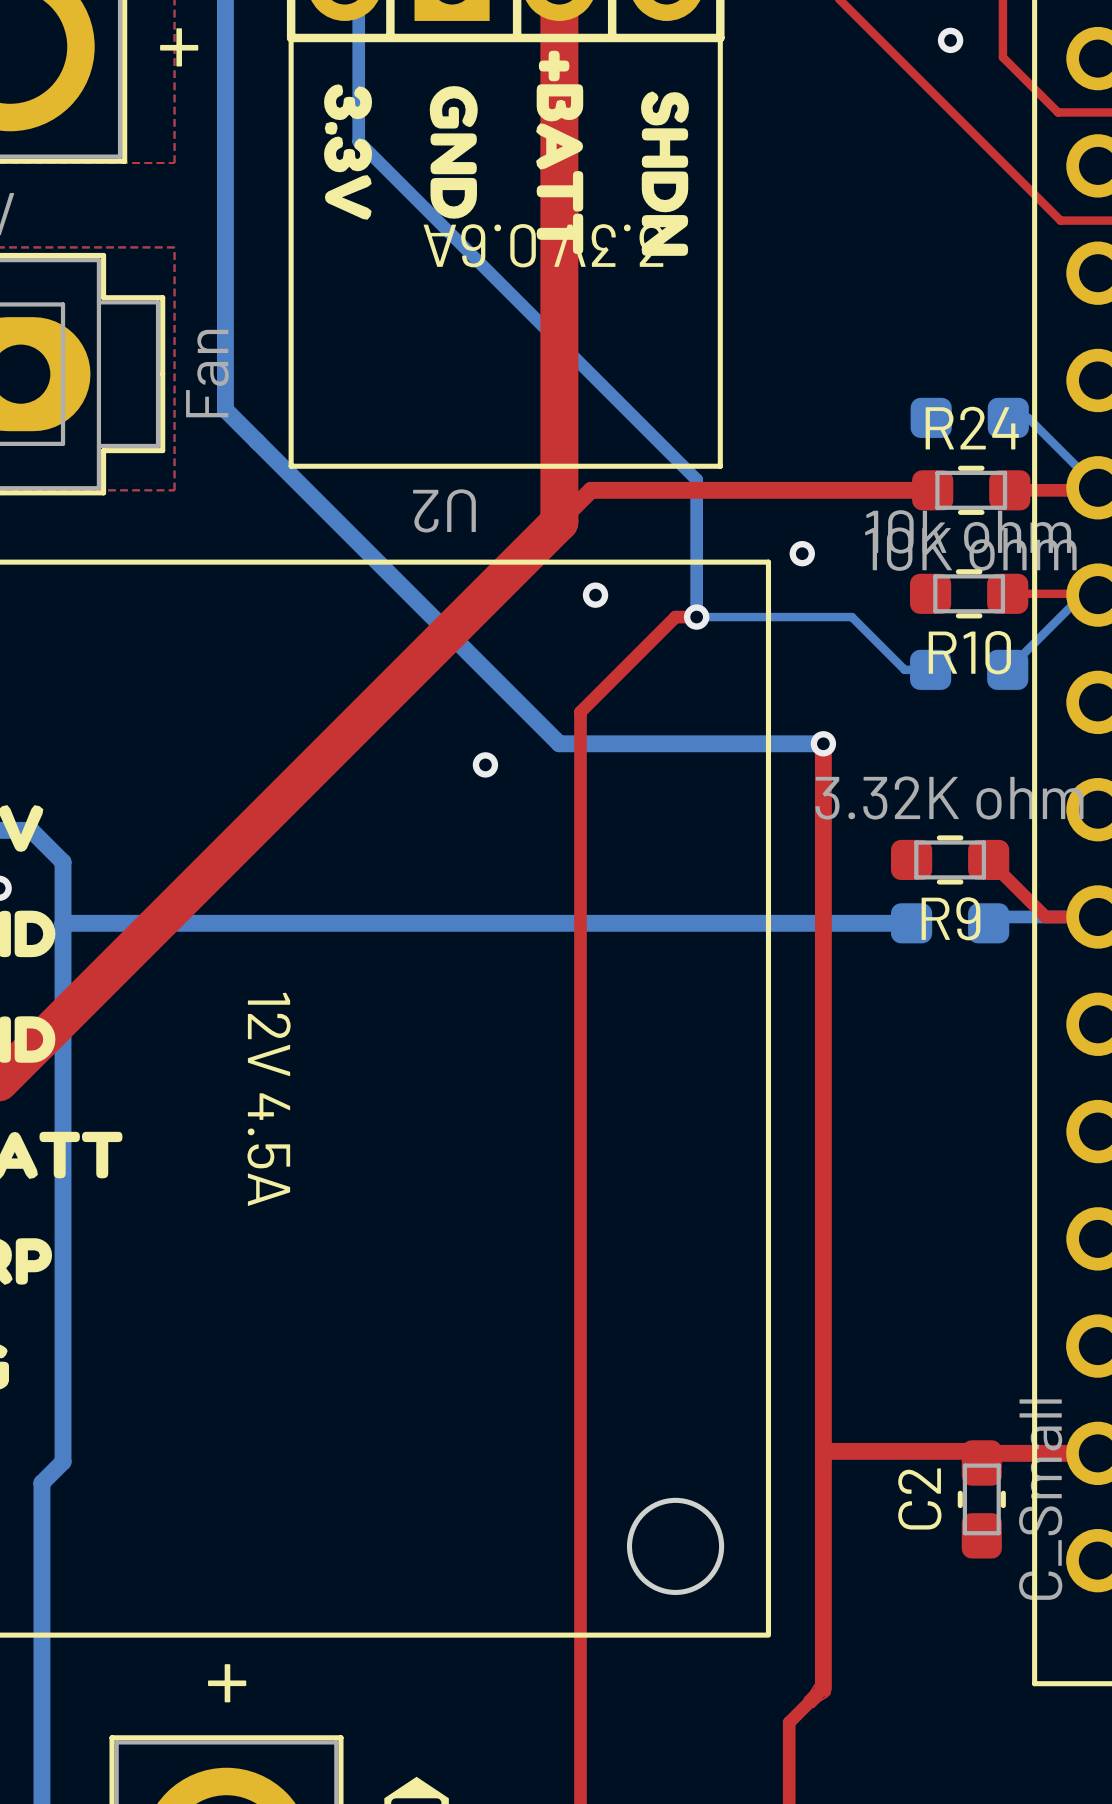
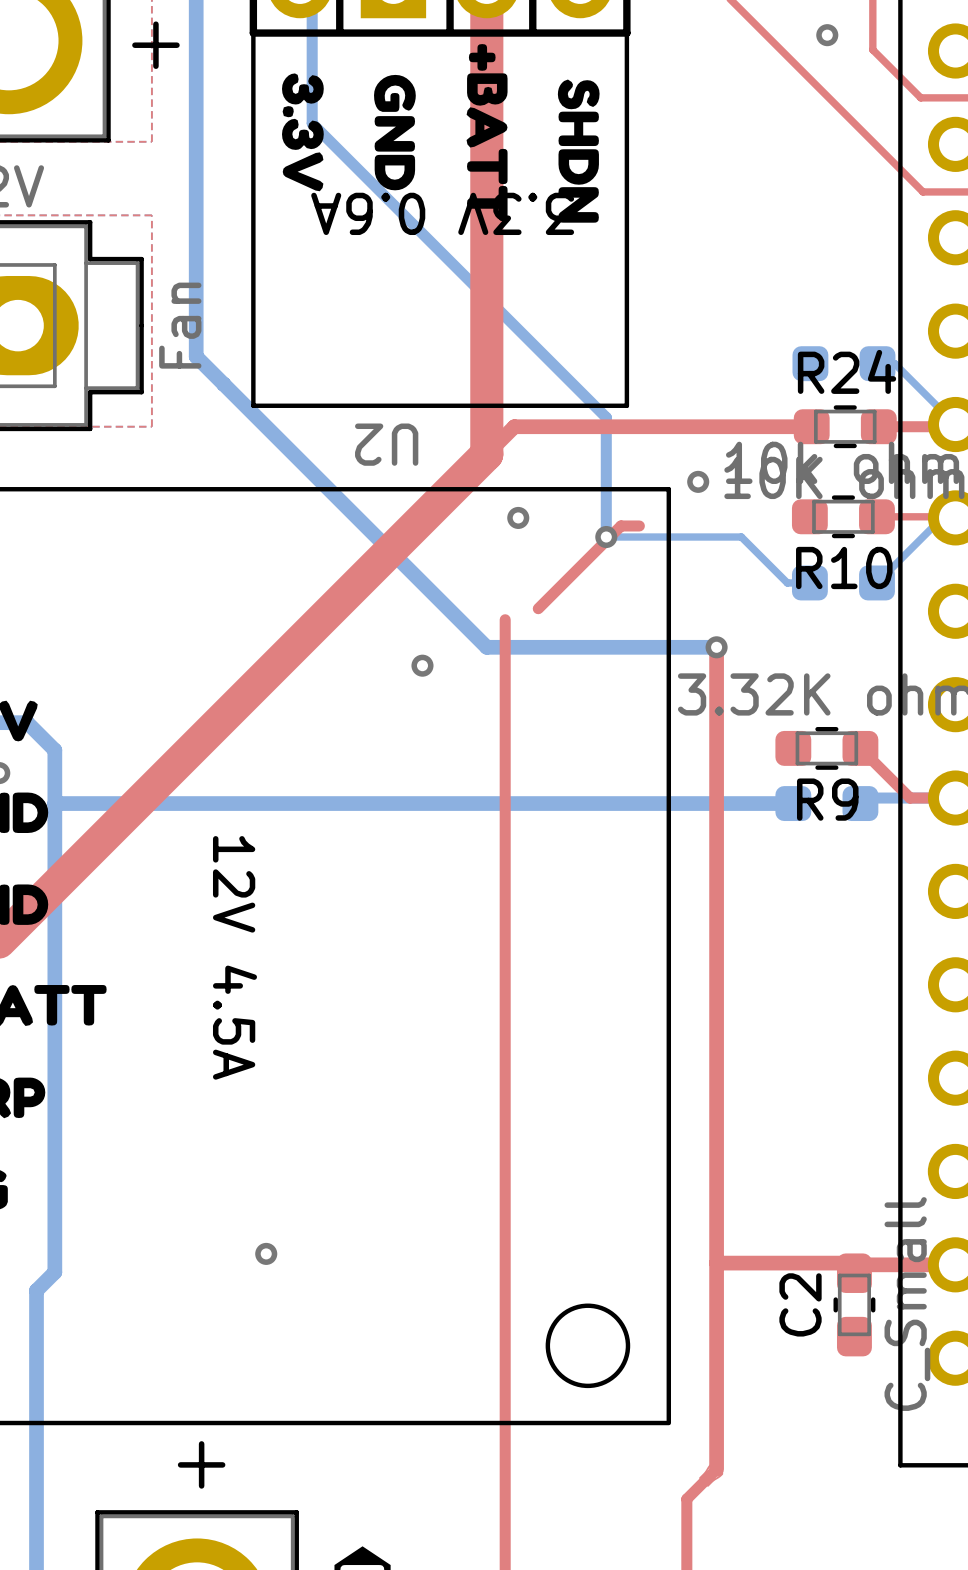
top track: (696, 617) (675, 617) (580, 712) -> (639, 525) (621, 525) (538, 608)
via: none -> (266, 1253)

